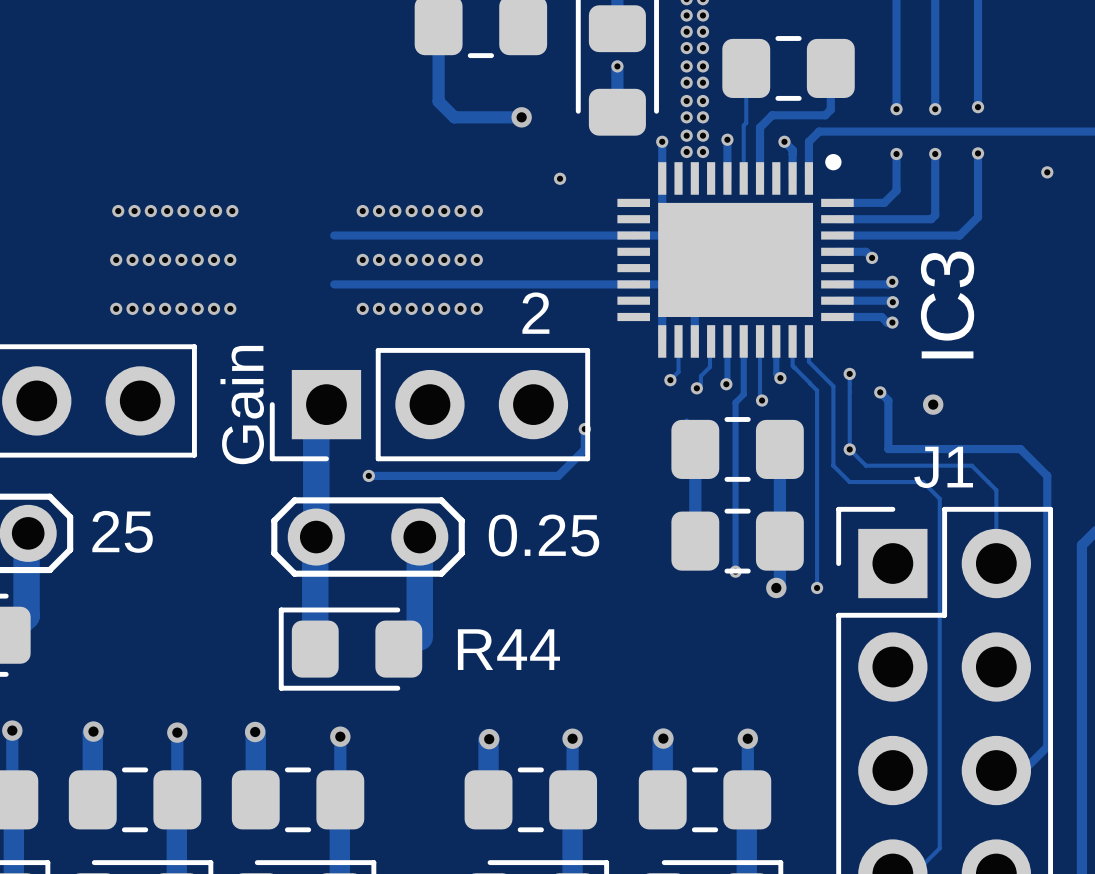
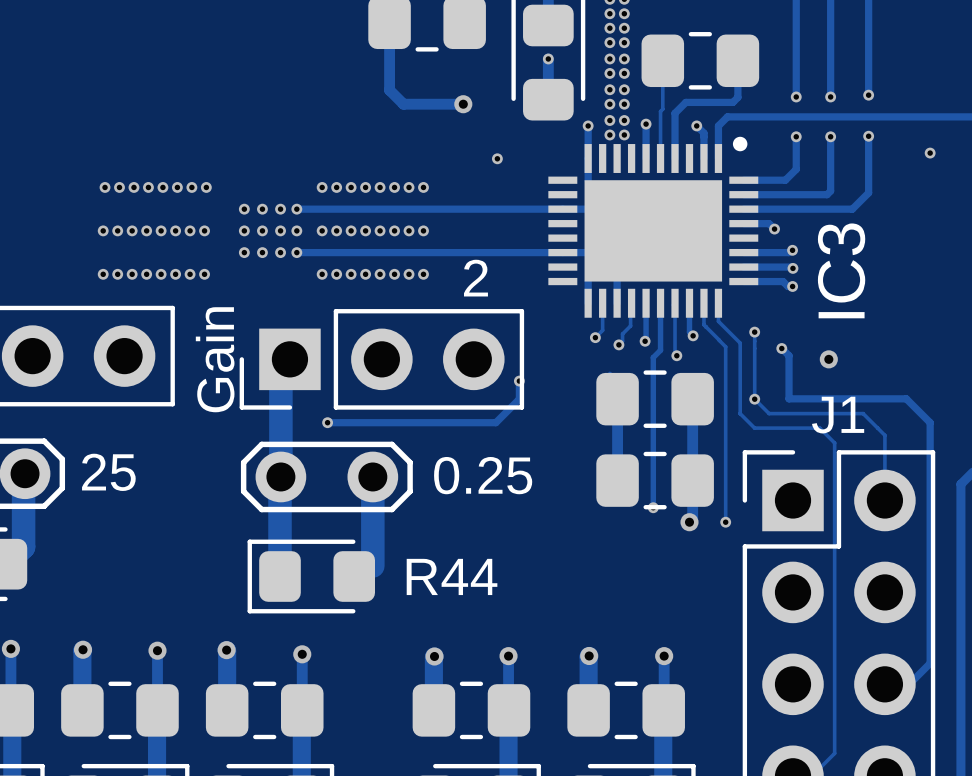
via: none -> (244, 209)
via: none -> (262, 209)
via: none -> (280, 209)
via: none -> (296, 209)
via: none -> (244, 230)
via: none -> (262, 230)
via: none -> (280, 230)
via: none -> (296, 230)
via: none -> (244, 252)
via: none -> (262, 252)
via: none -> (280, 252)
via: none -> (296, 252)

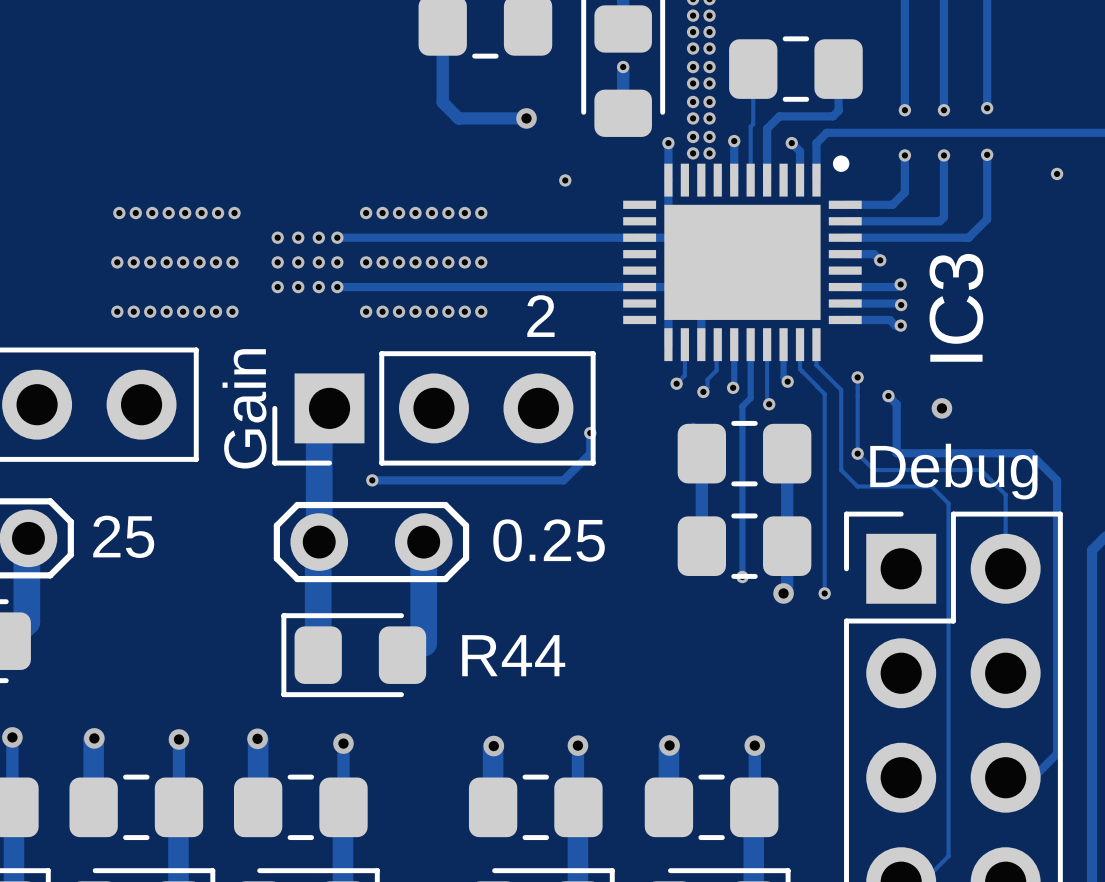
J1 name: J1 (838, 415) -> Debug (953, 471)

